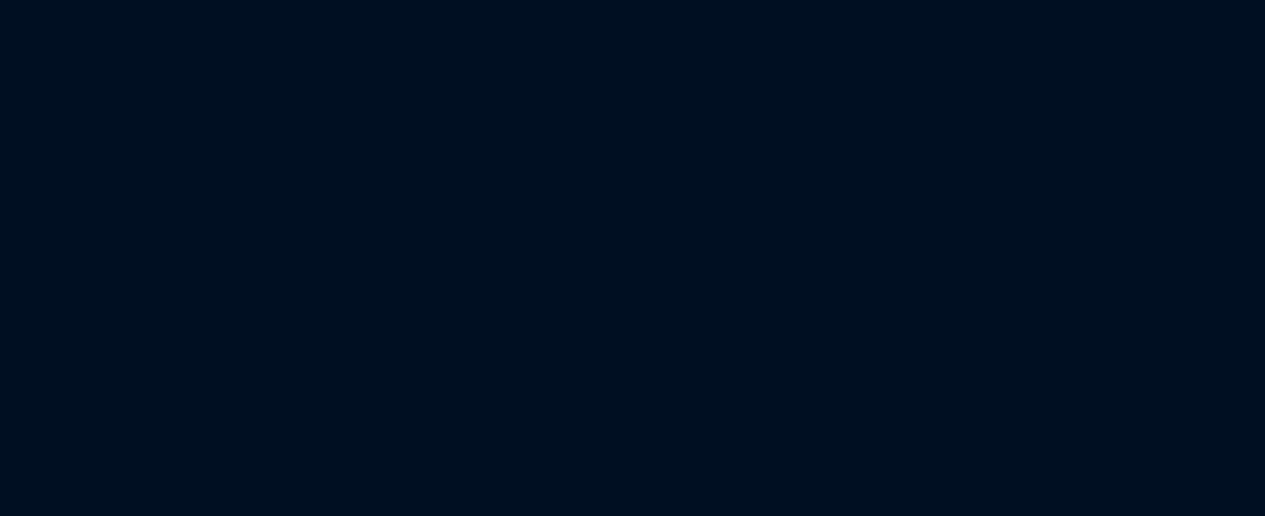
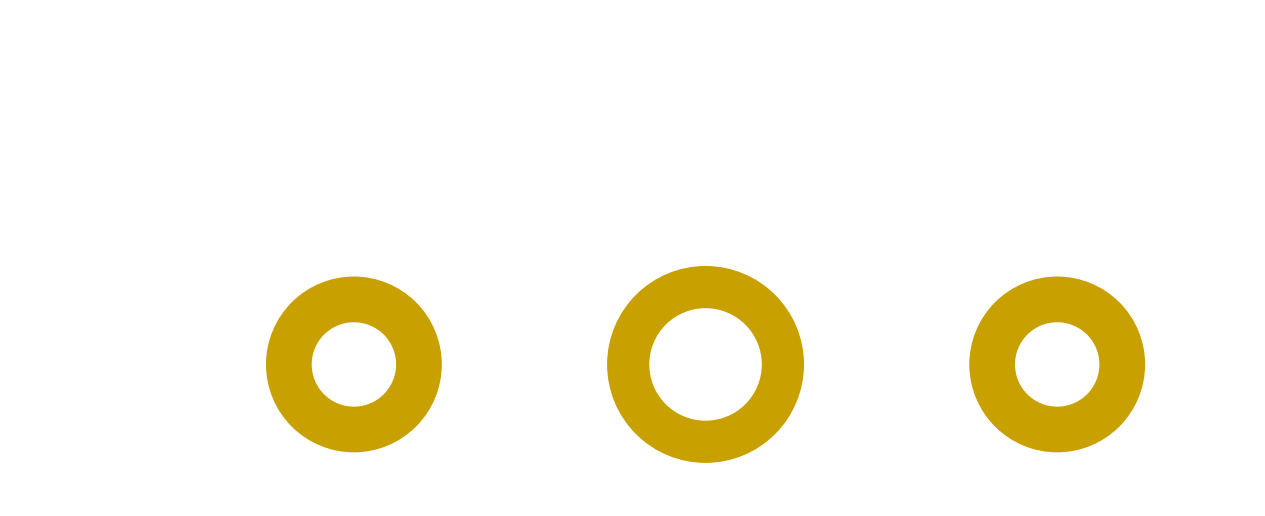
part: none -> (705, 364)

